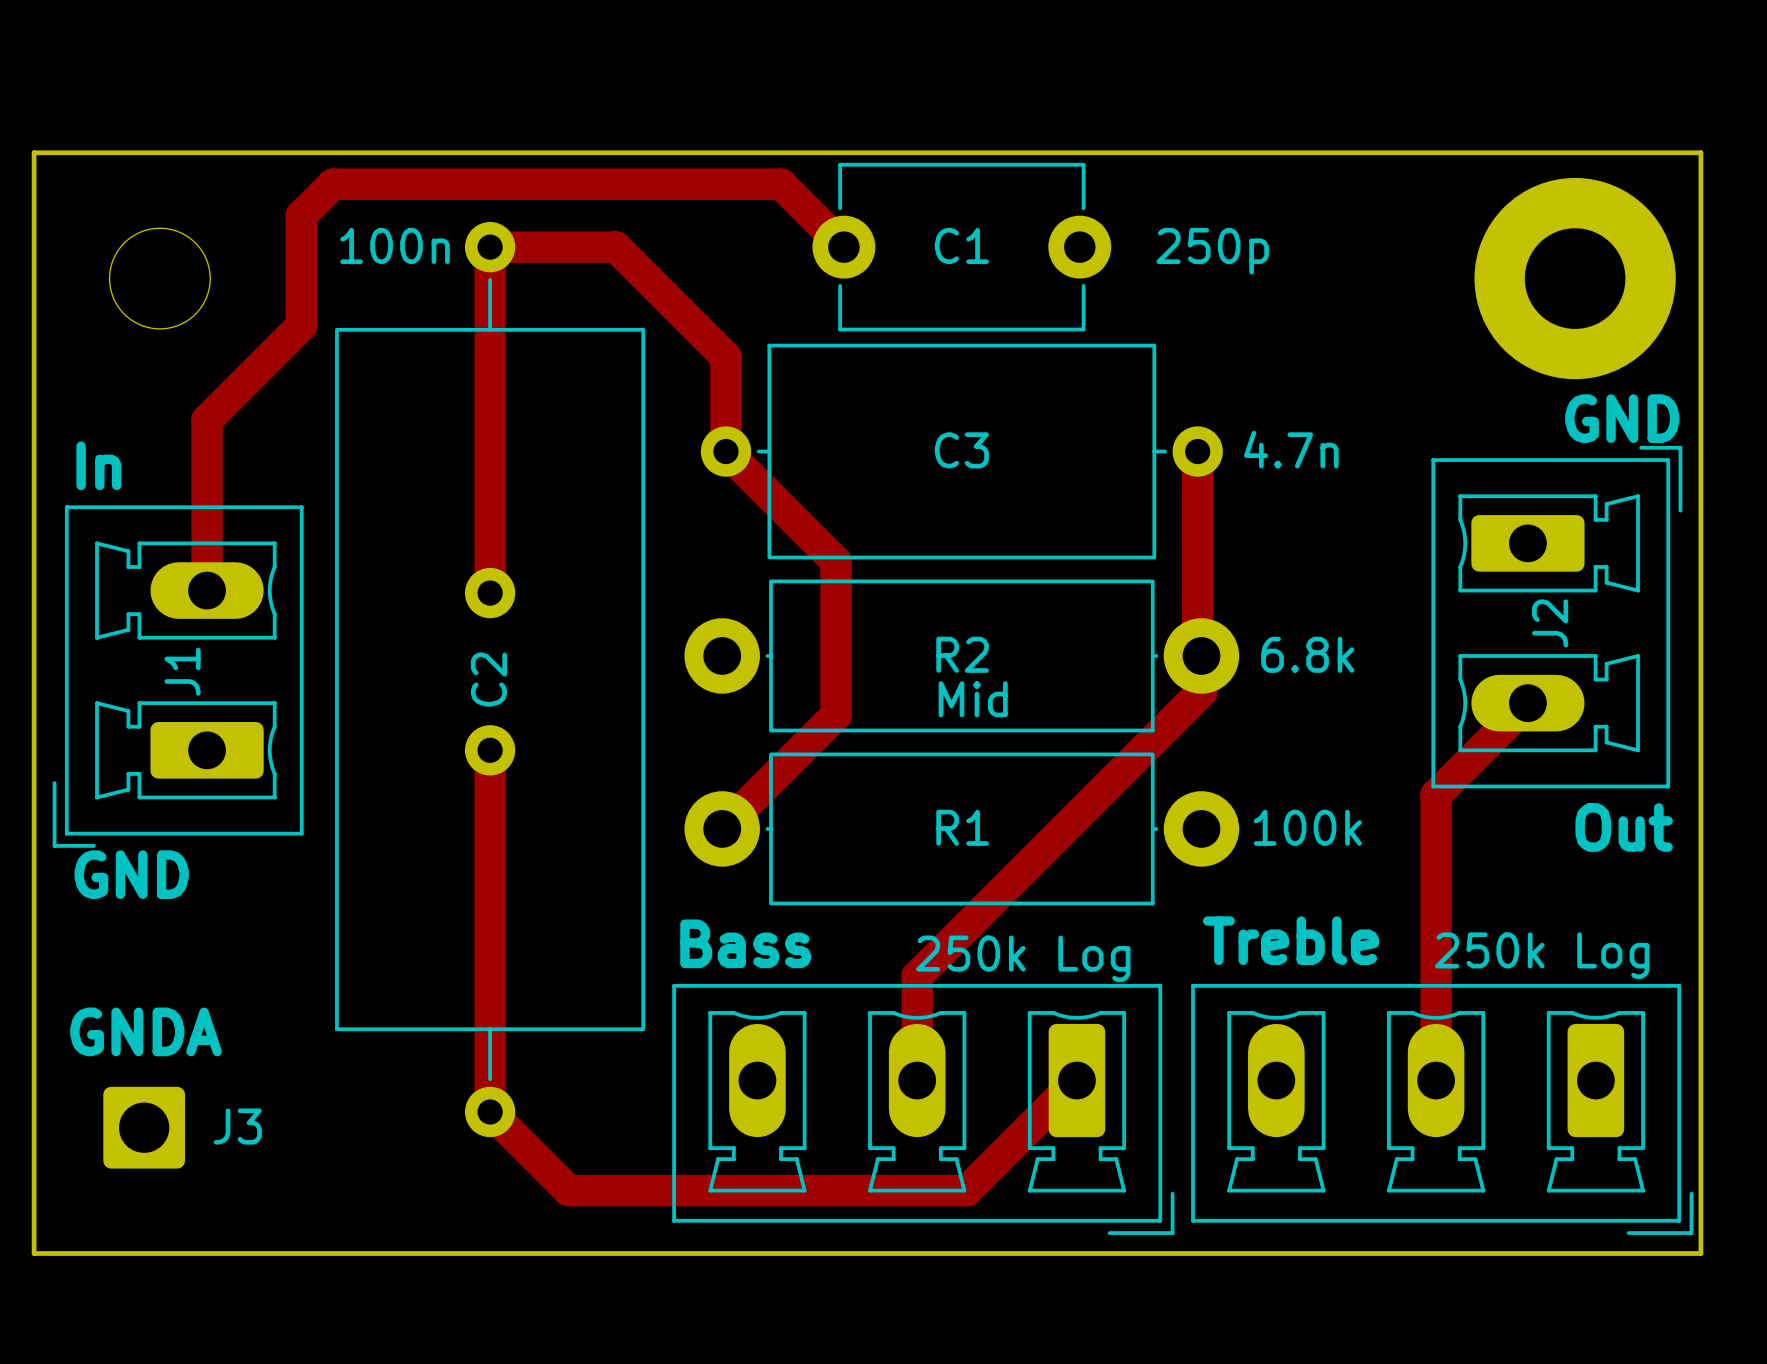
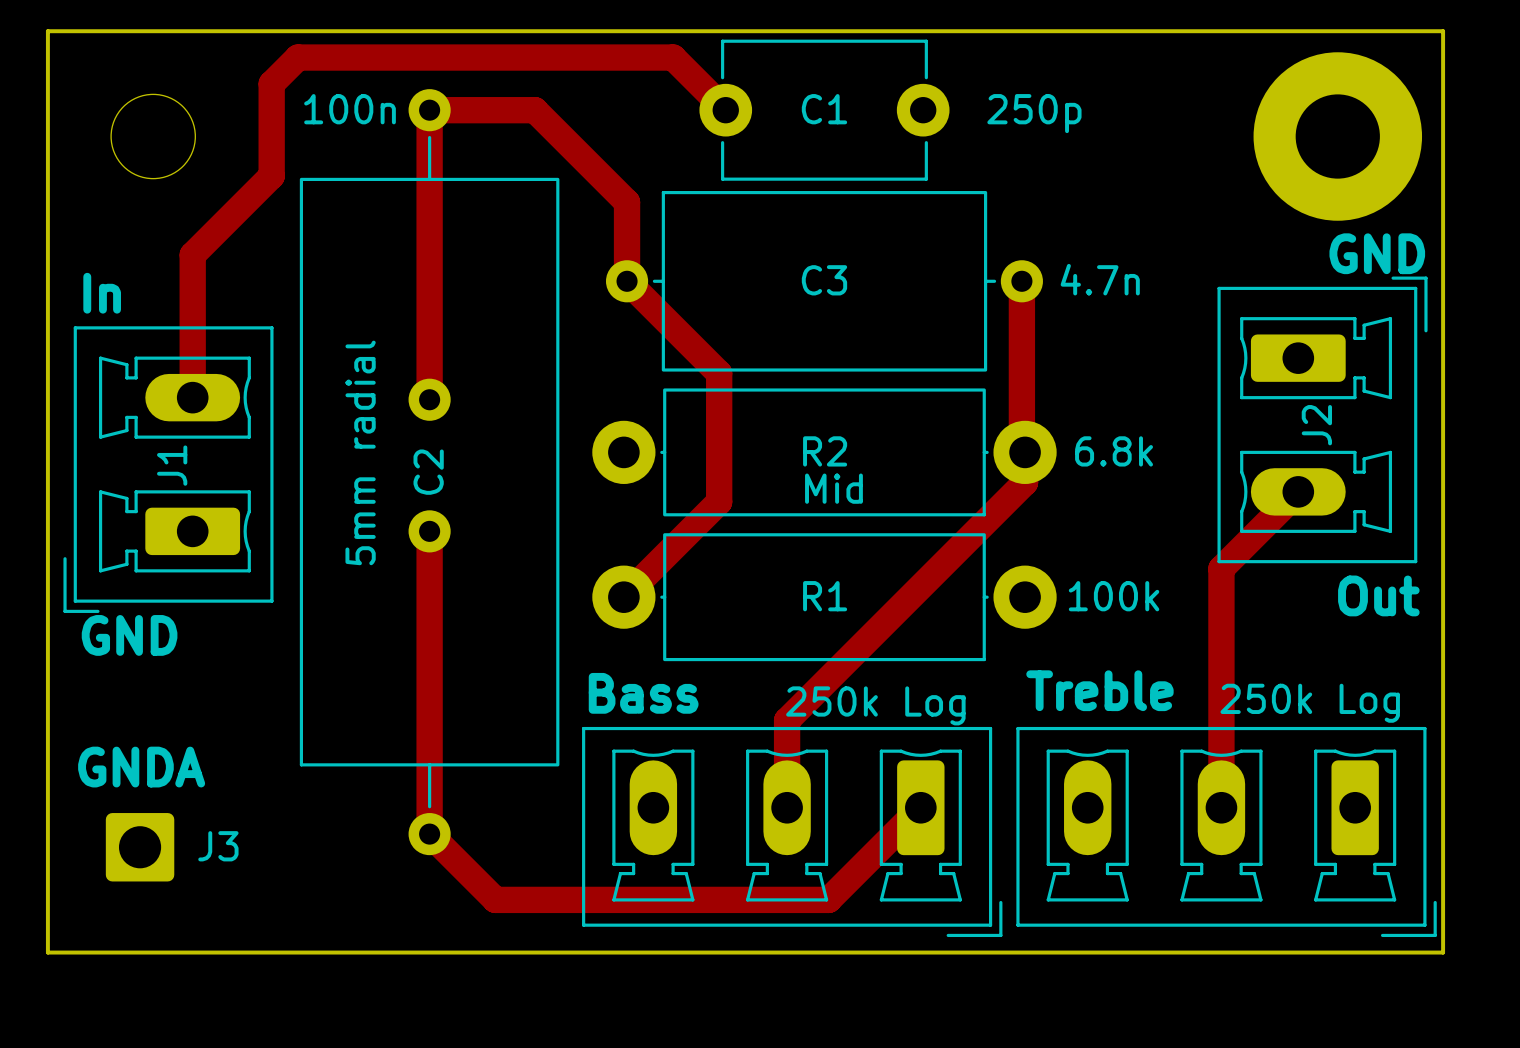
text: none -> 5mm radial (360, 452)

